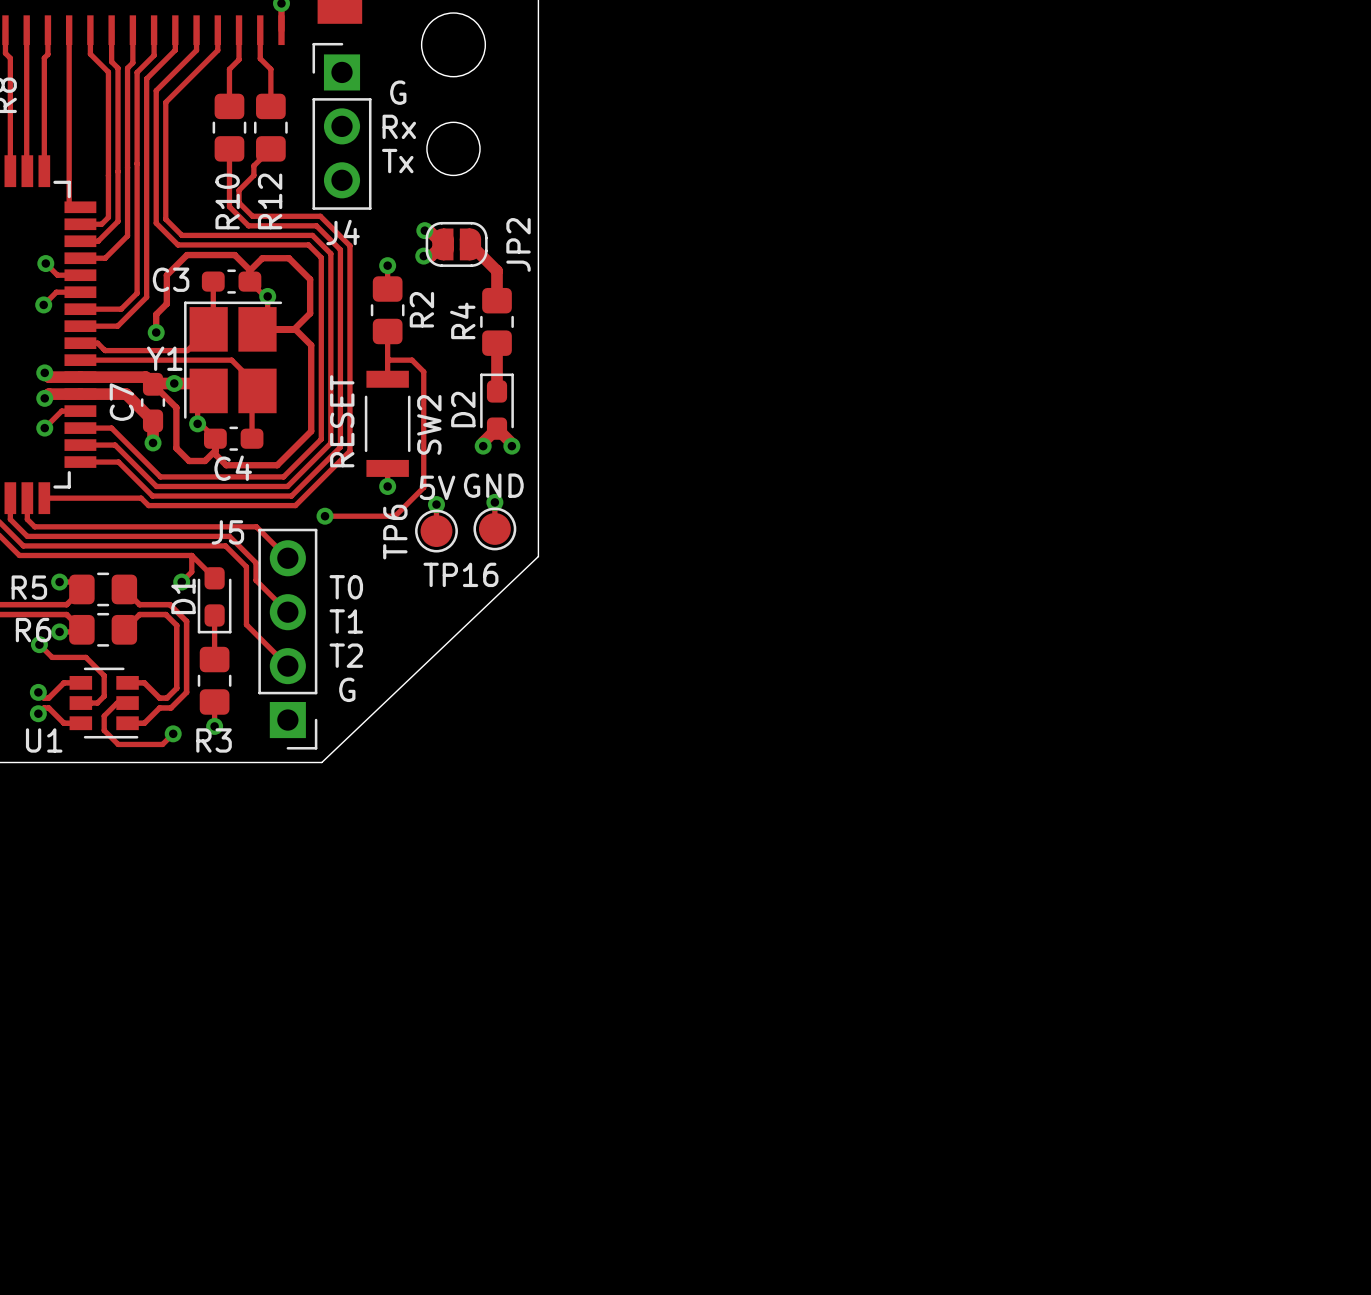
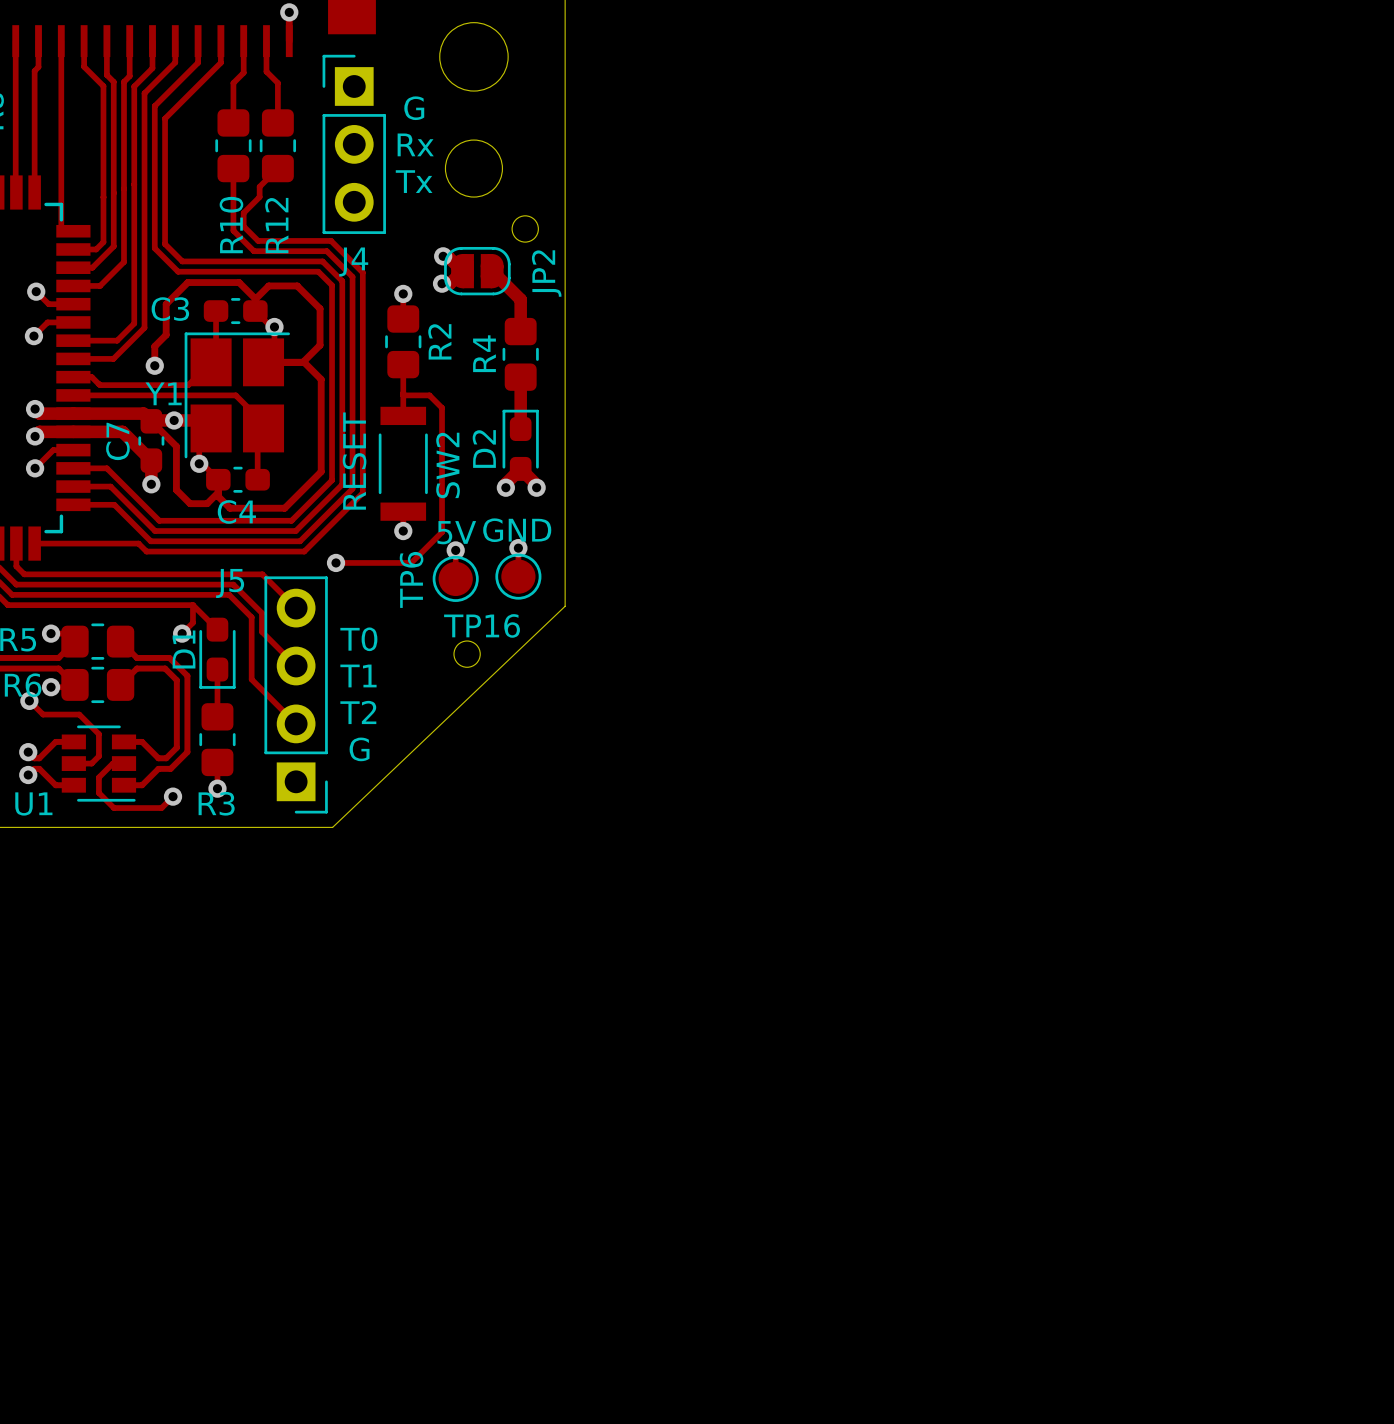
round board edge: none -> [511, 215, 539, 243]
round board edge: none -> [453, 640, 481, 668]

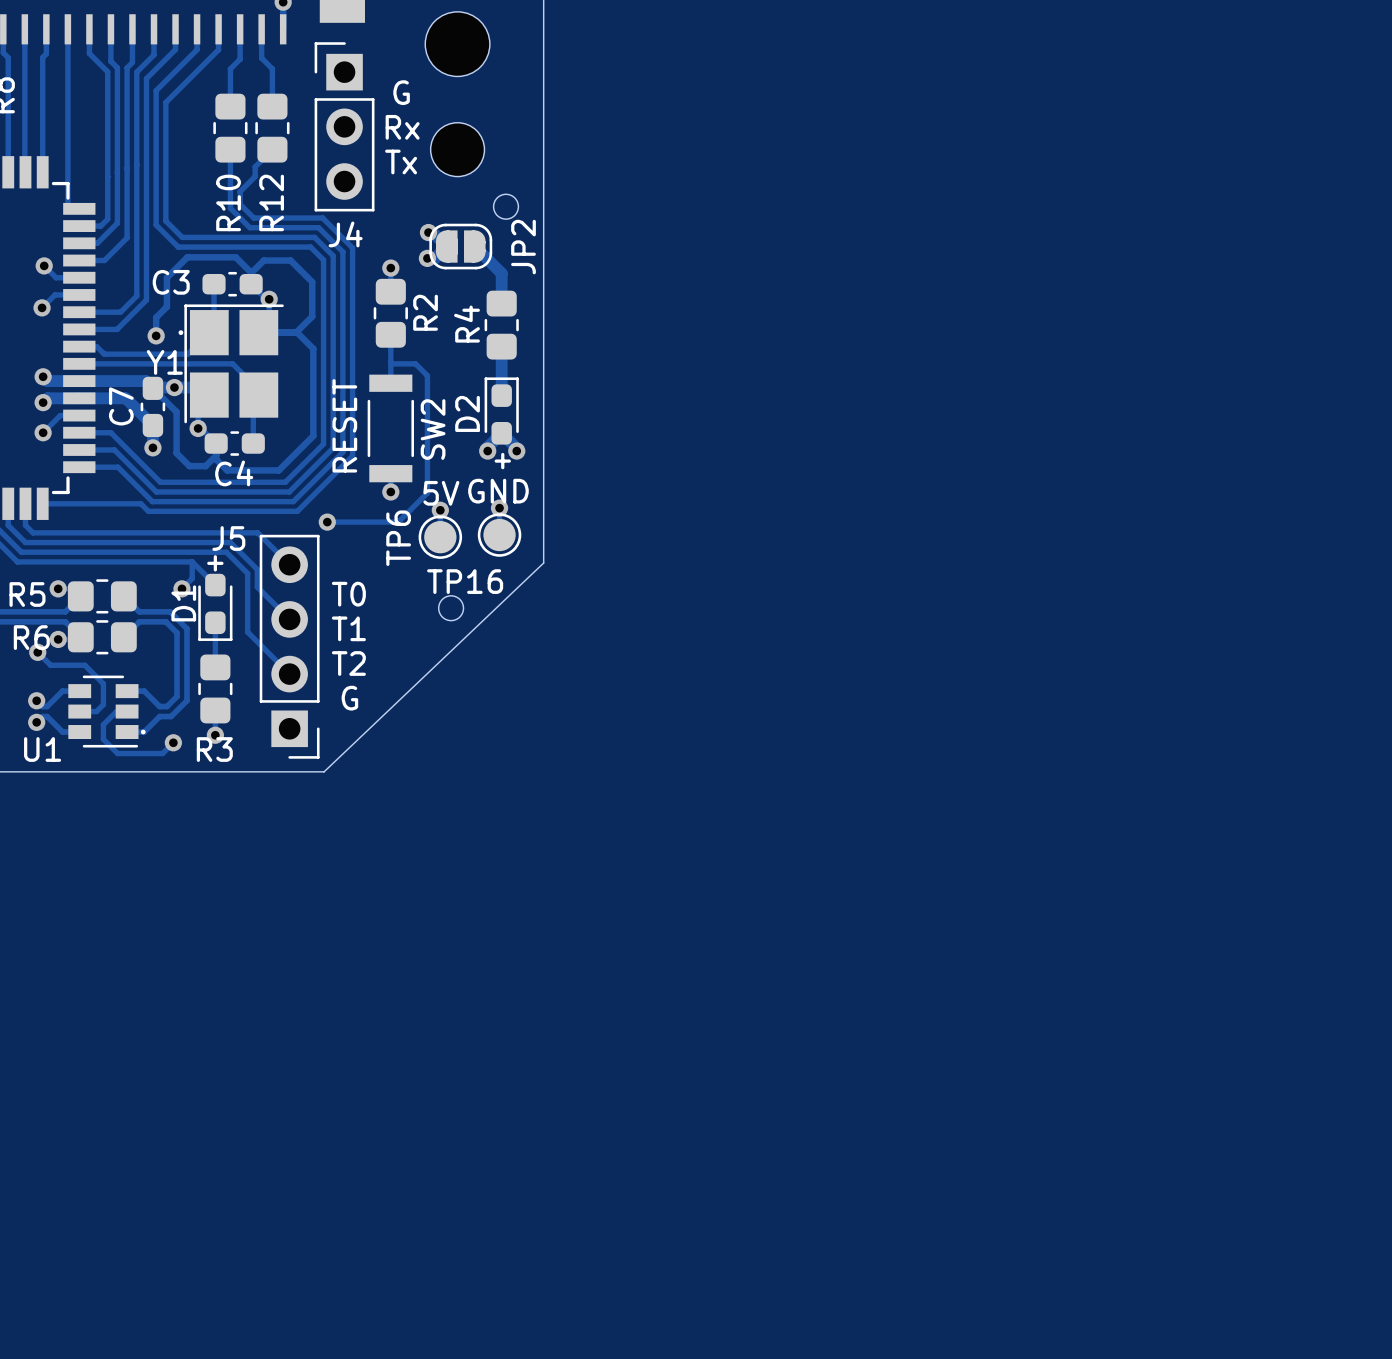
drawing: none -> [178, 330, 184, 336]
text: none -> + (502, 461)
text: none -> + (215, 563)
drawing: none -> [140, 729, 146, 735]

